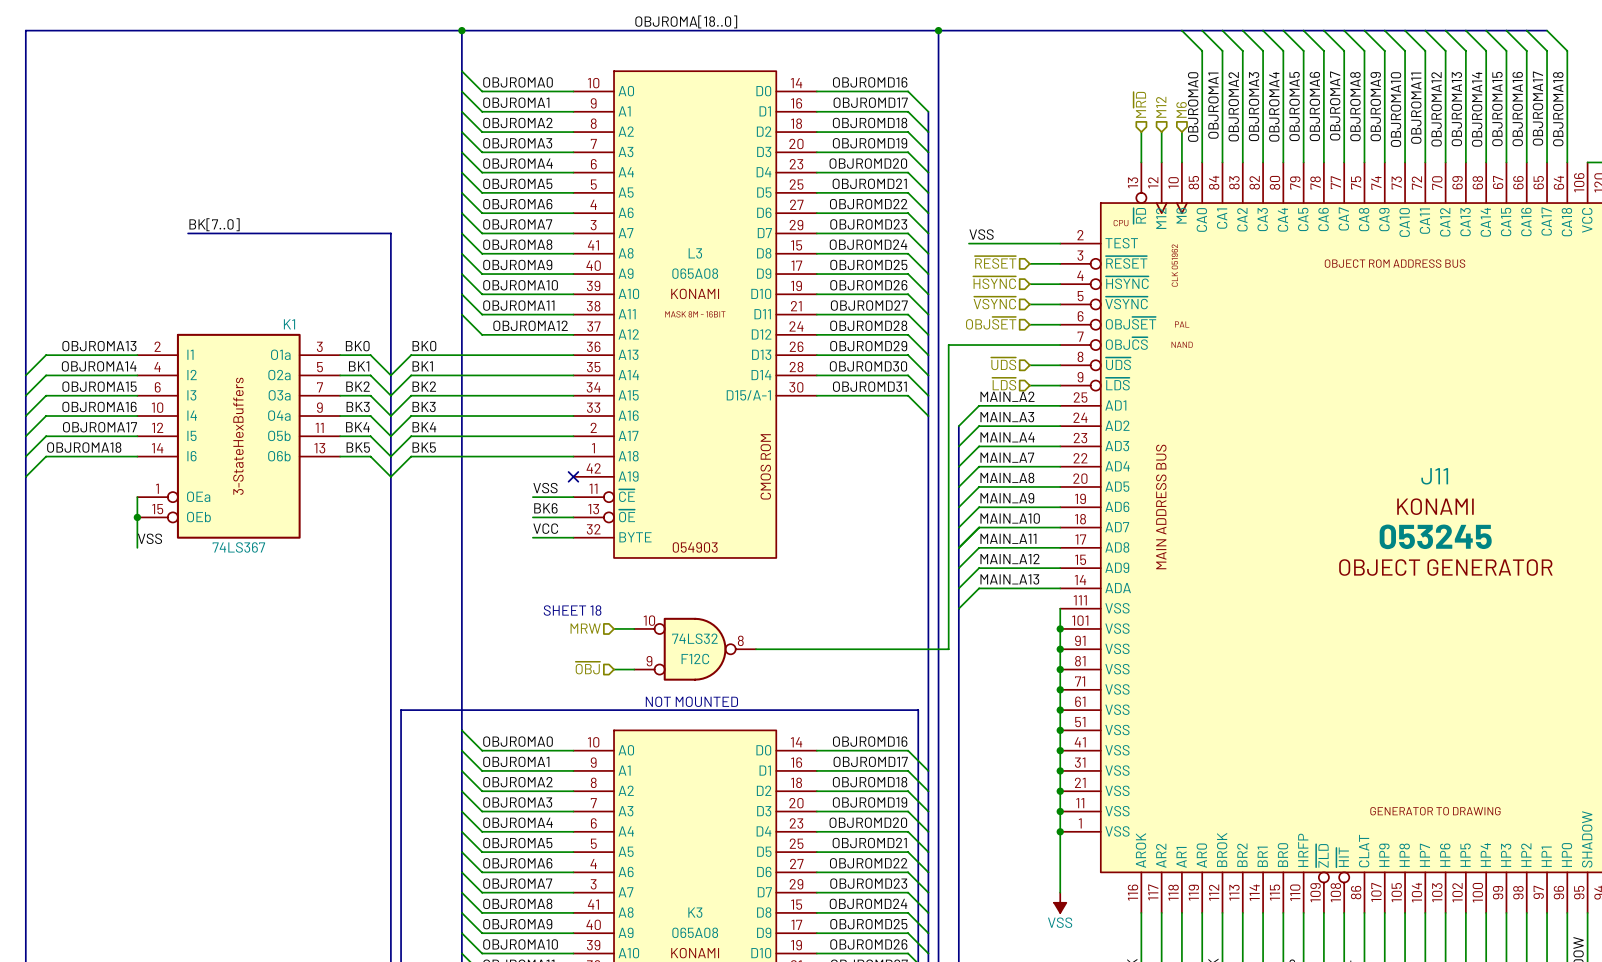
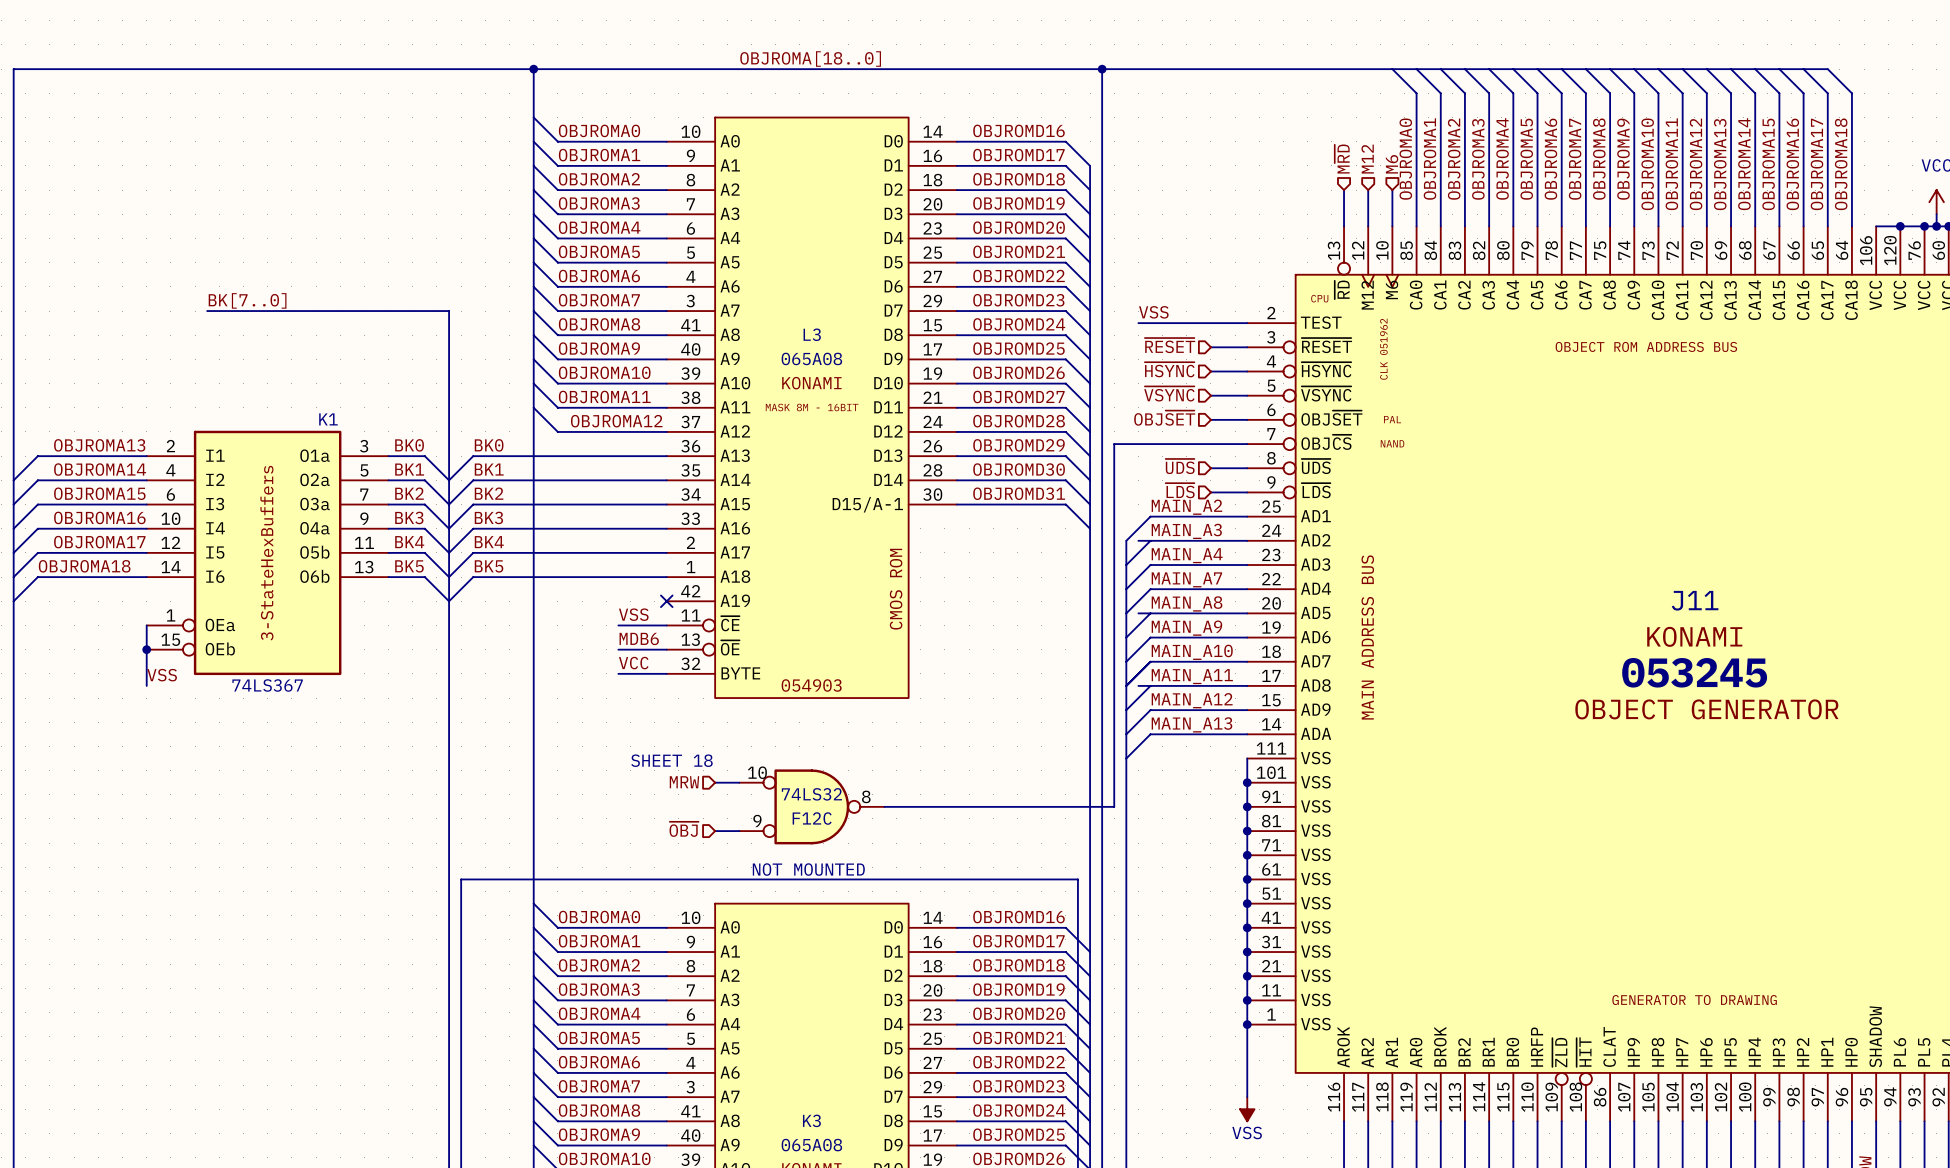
wire: none -> (1138, 540) (1150, 540)
wire: none -> (1138, 613) (1150, 613)
label: BK6 (545, 508) -> MDB6 (639, 638)
wire: none -> (1138, 685) (1150, 685)

